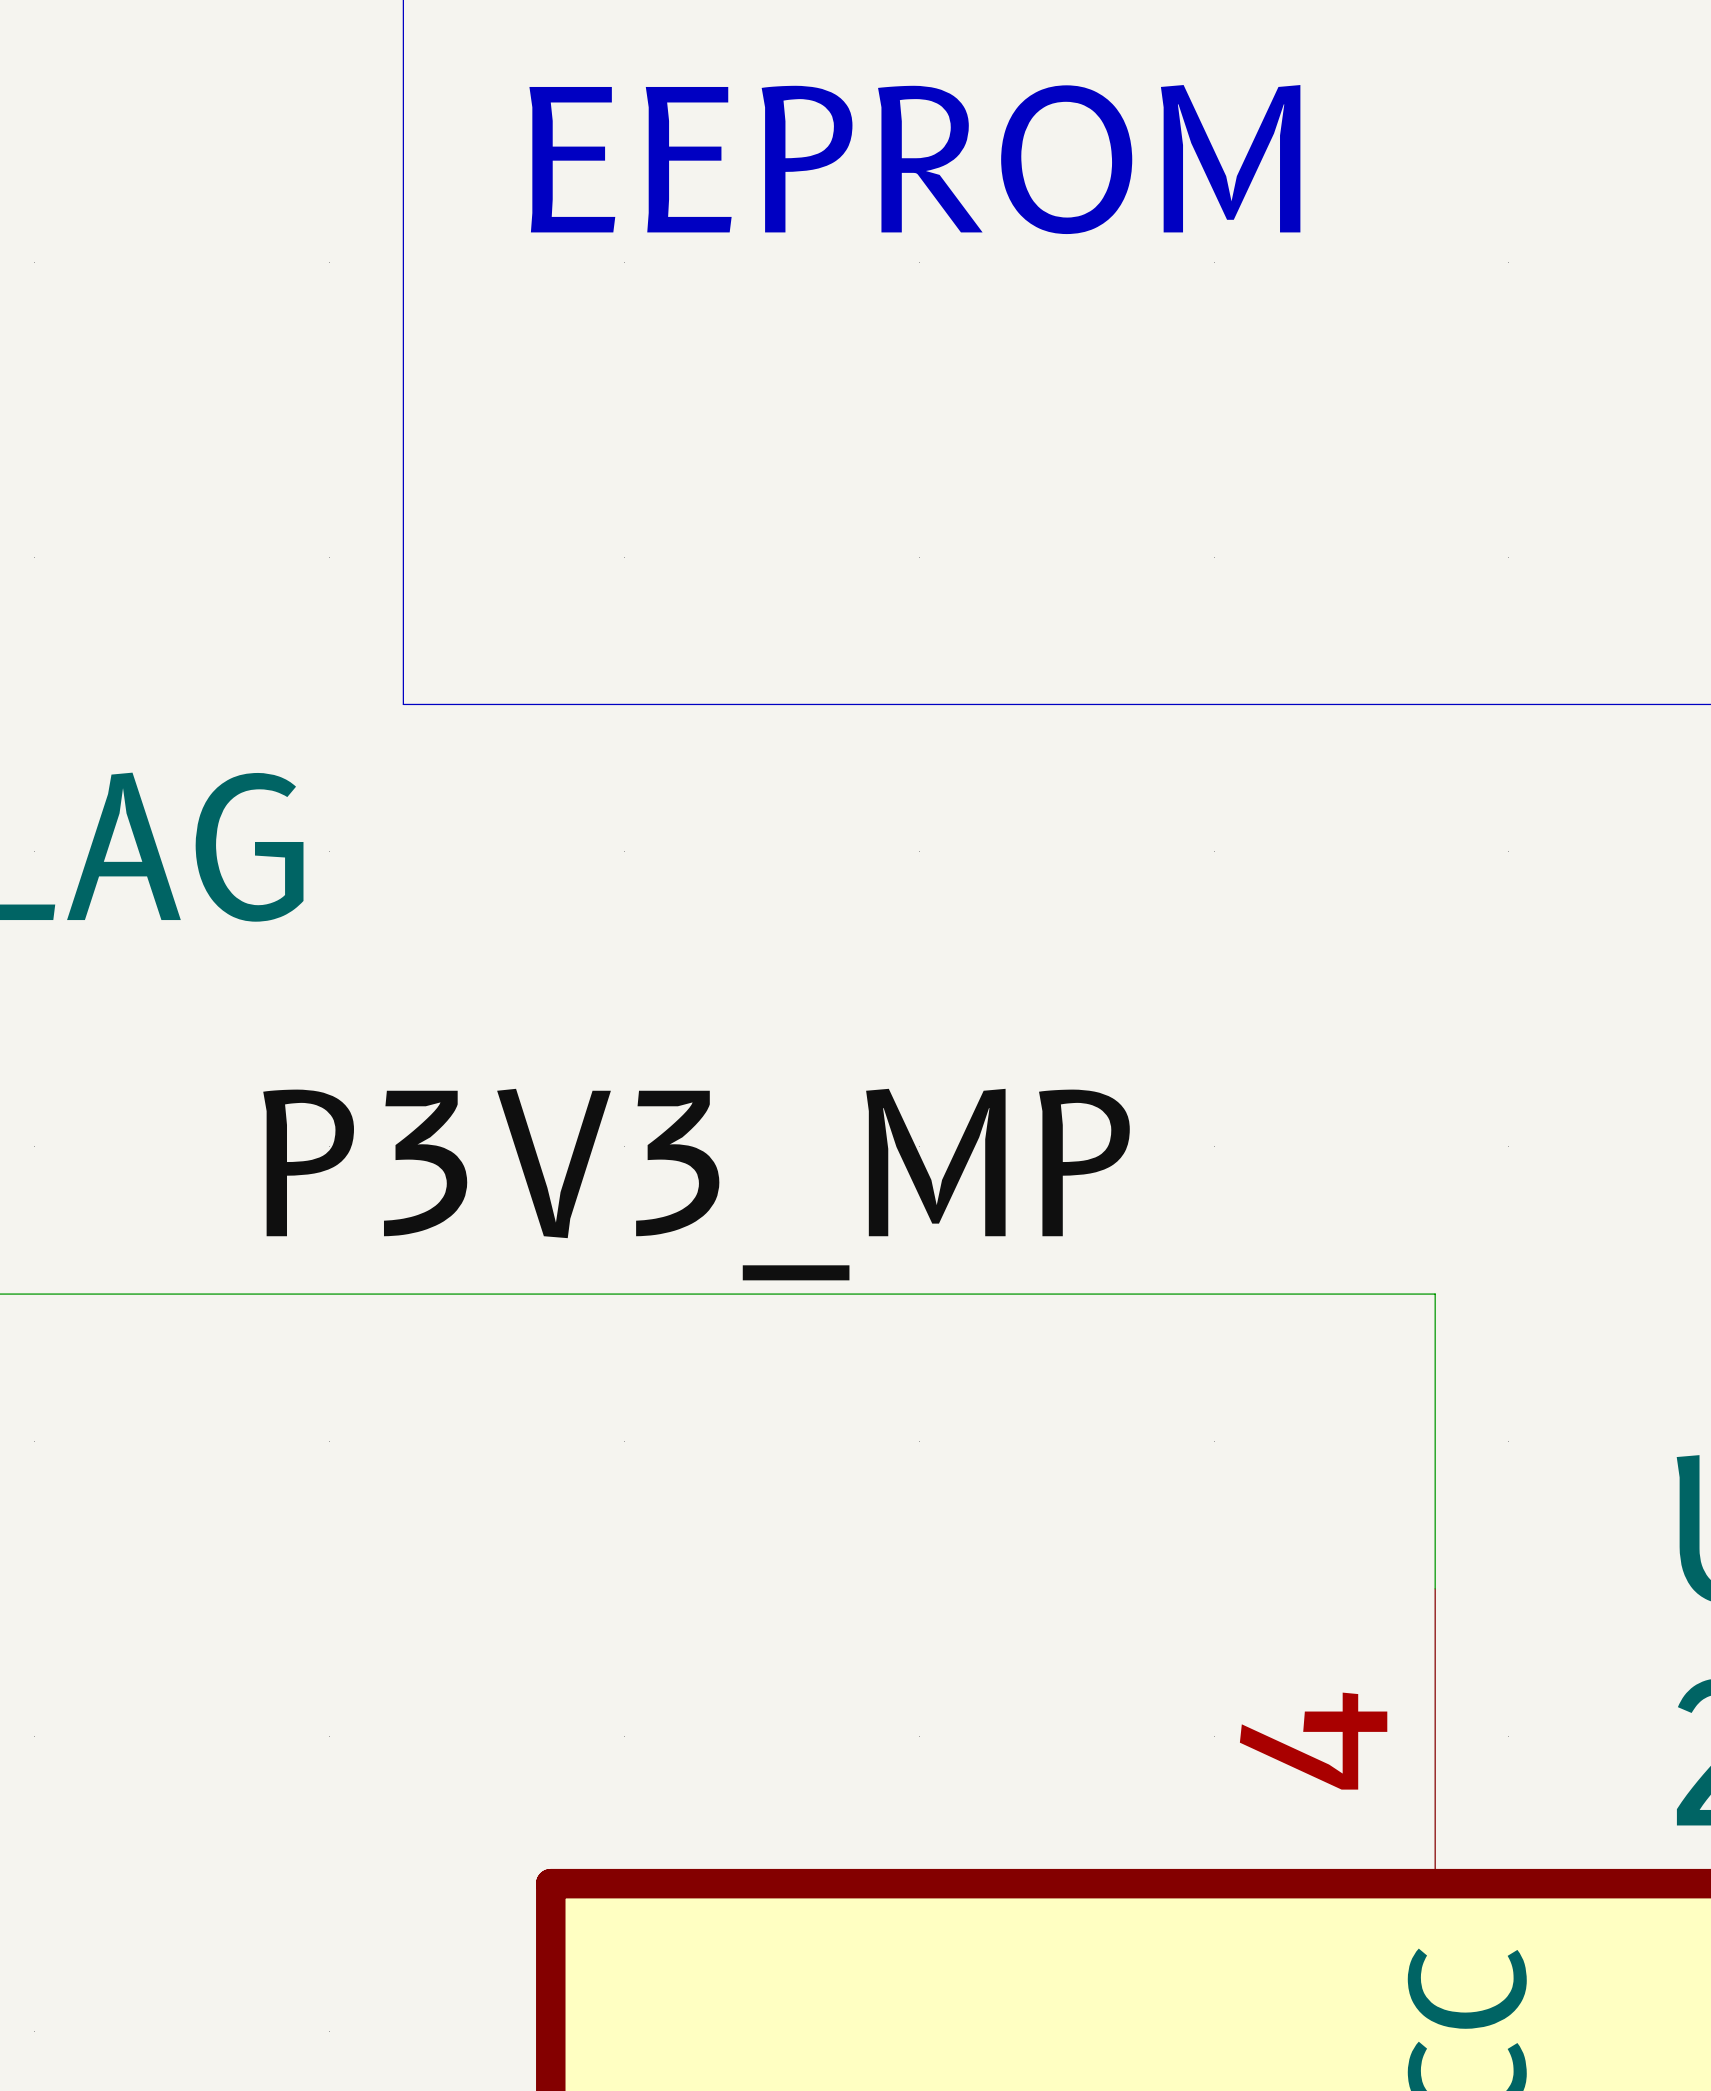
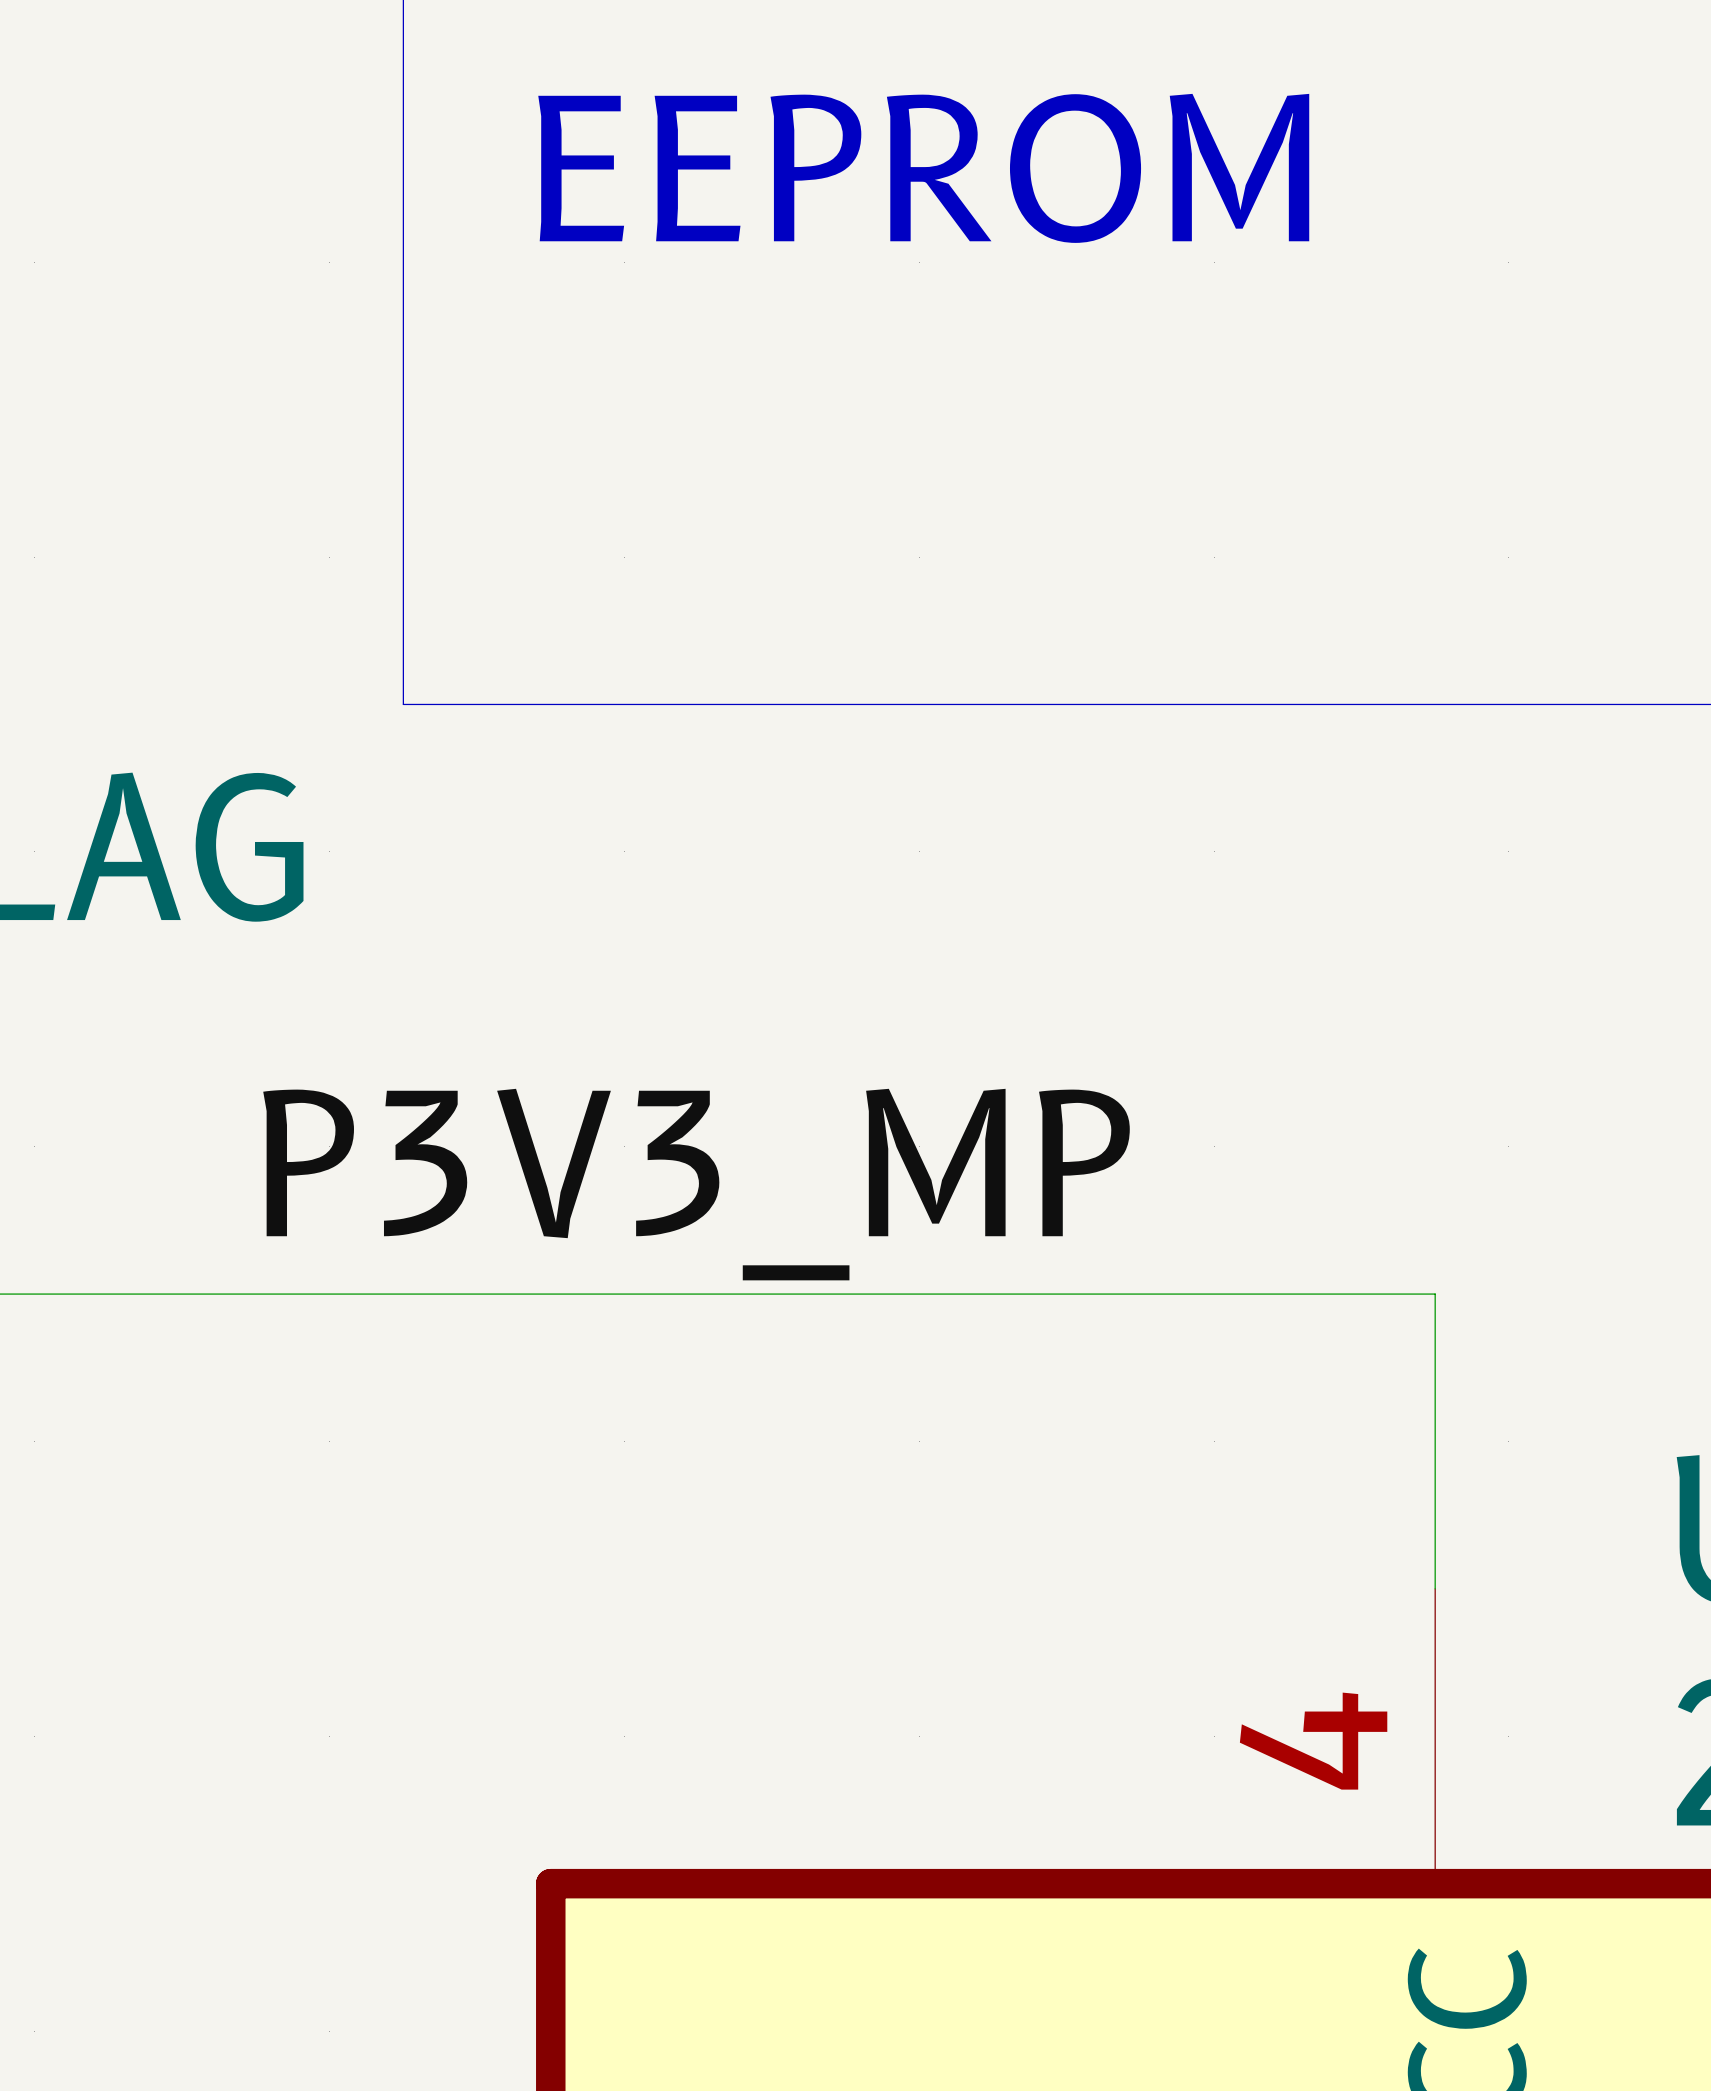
text position: EEPROM (914, 159) -> EEPROM (923, 168)

